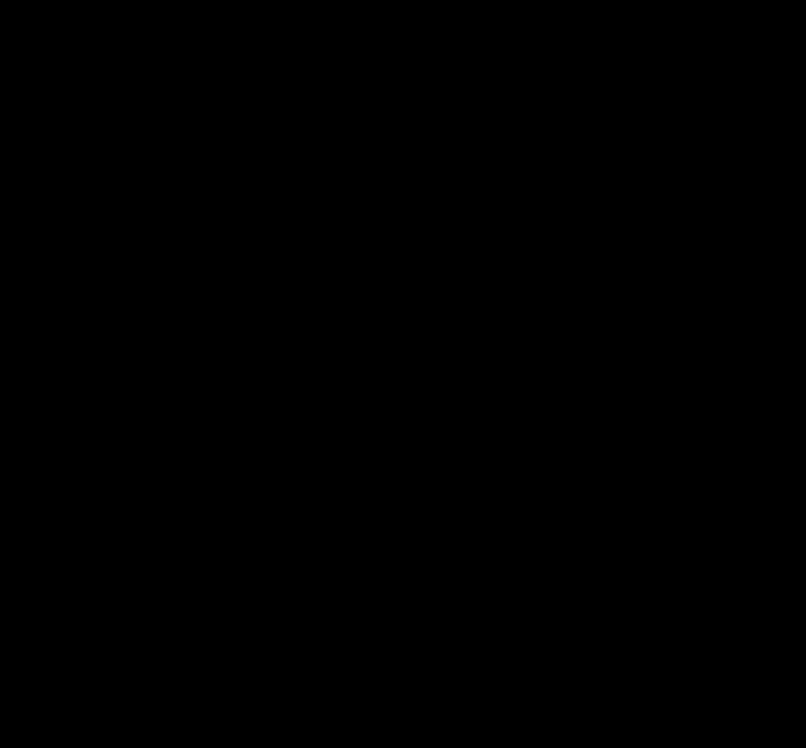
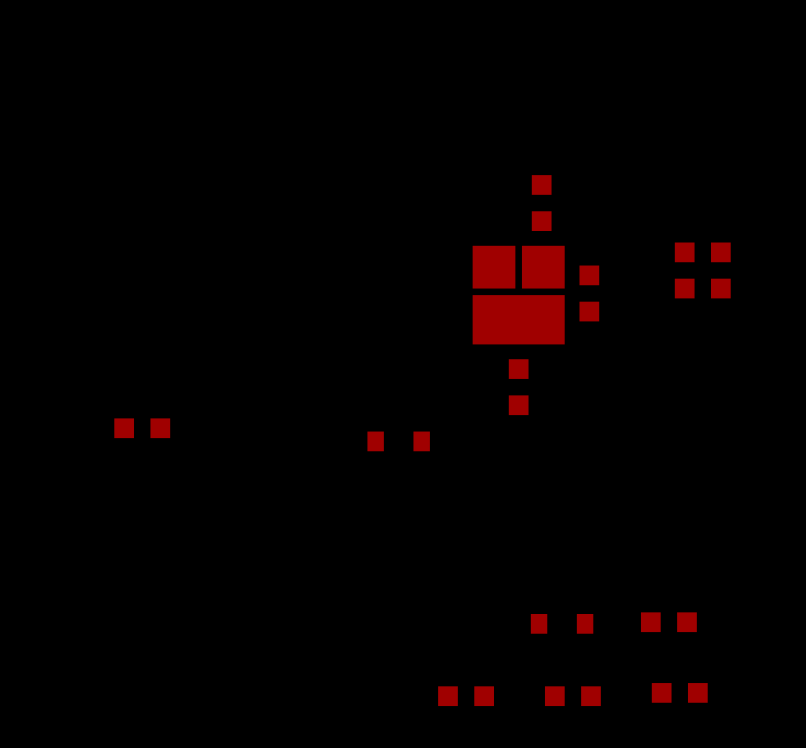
part: none -> (541, 203)
part: none -> (702, 252)
part: none -> (702, 288)
part: none -> (589, 293)
part: none -> (518, 295)
part: none -> (518, 387)
part: none -> (142, 428)
part: none -> (398, 441)
part: none -> (668, 622)
part: none -> (562, 623)
part: none -> (679, 692)
part: none -> (466, 696)
part: none -> (572, 696)

